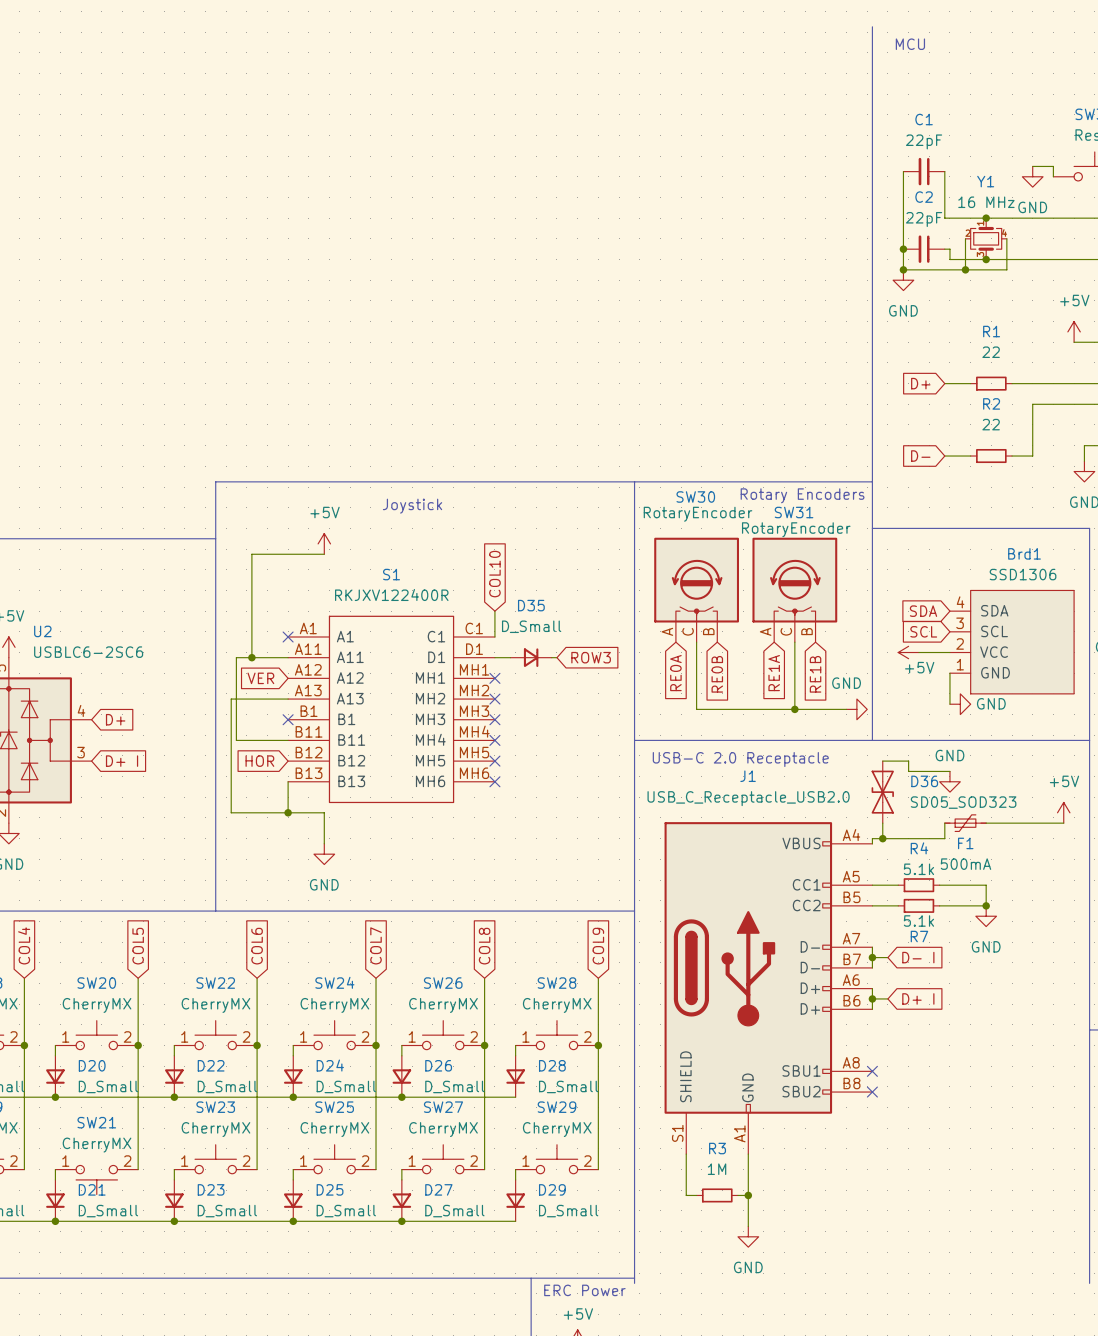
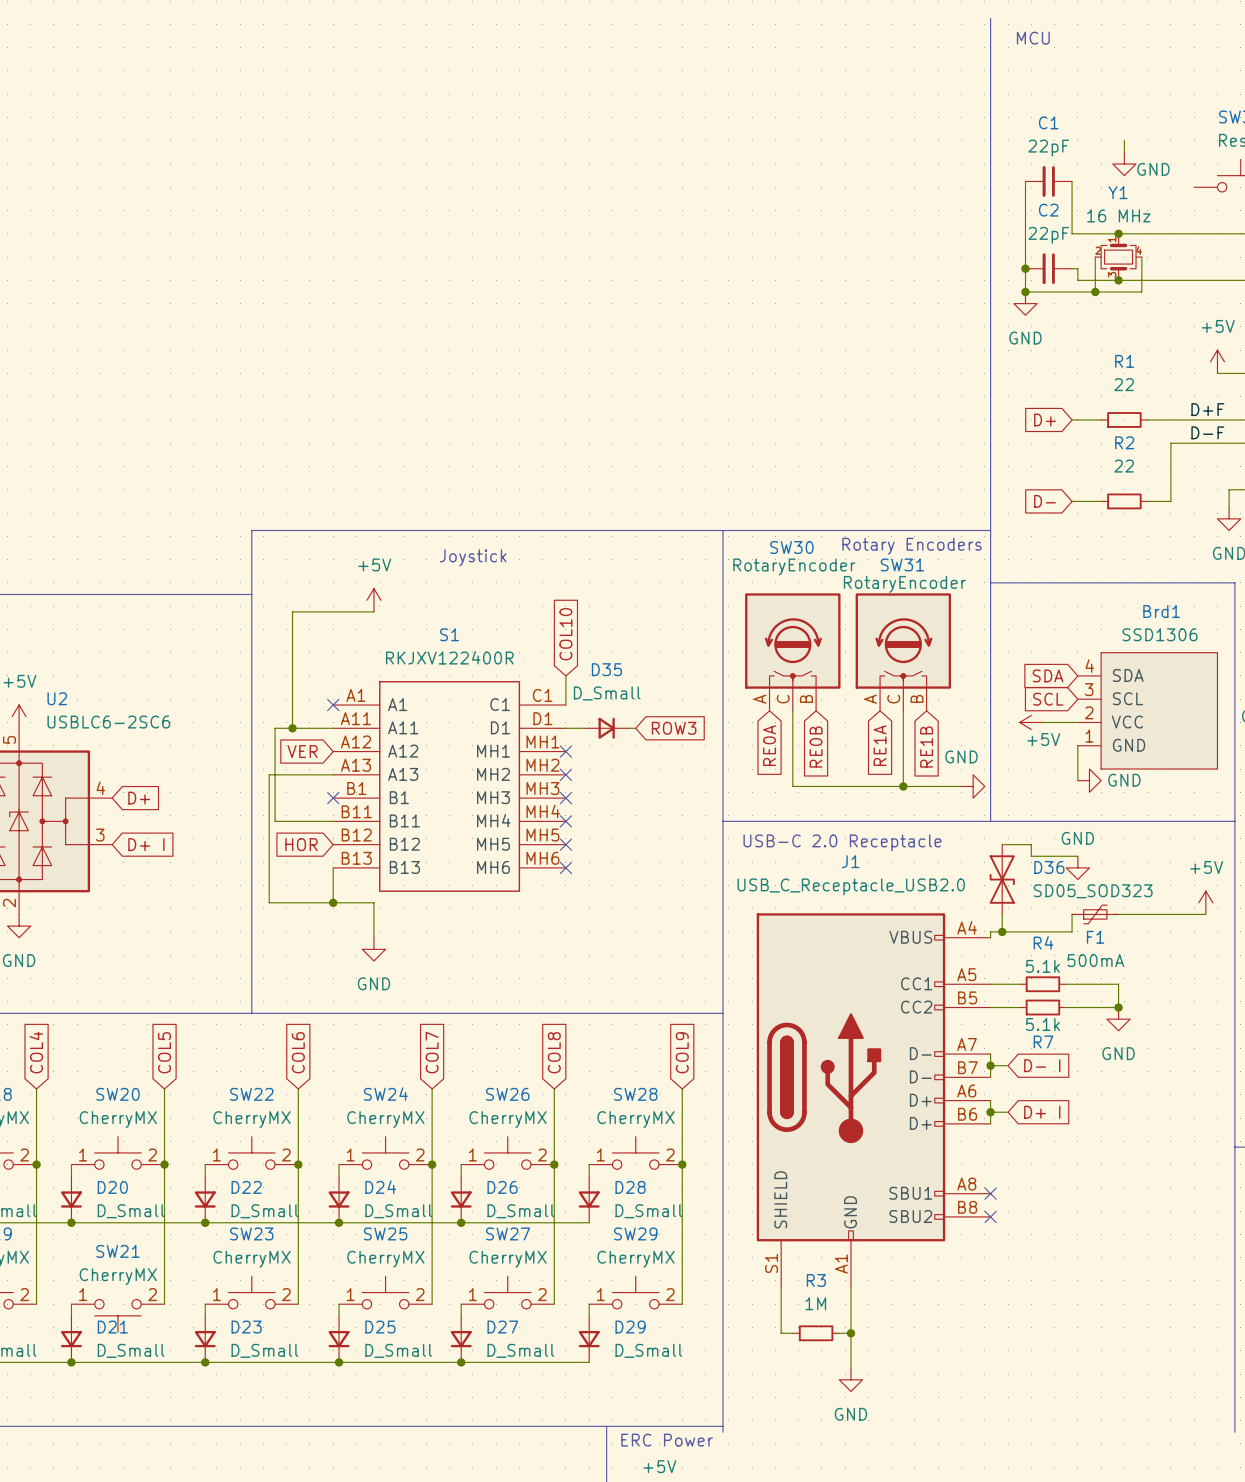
wire: none -> (1124, 140) (1124, 152)
wire: (1032, 166) (1053, 166) (1053, 176) -> none
power symbol position: GND (1032, 176) -> GND (1124, 164)
power symbol text position: GND (1032, 207) -> GND (1153, 169)
label: none -> D+F (1207, 409)
label: none -> D-F (1207, 432)

